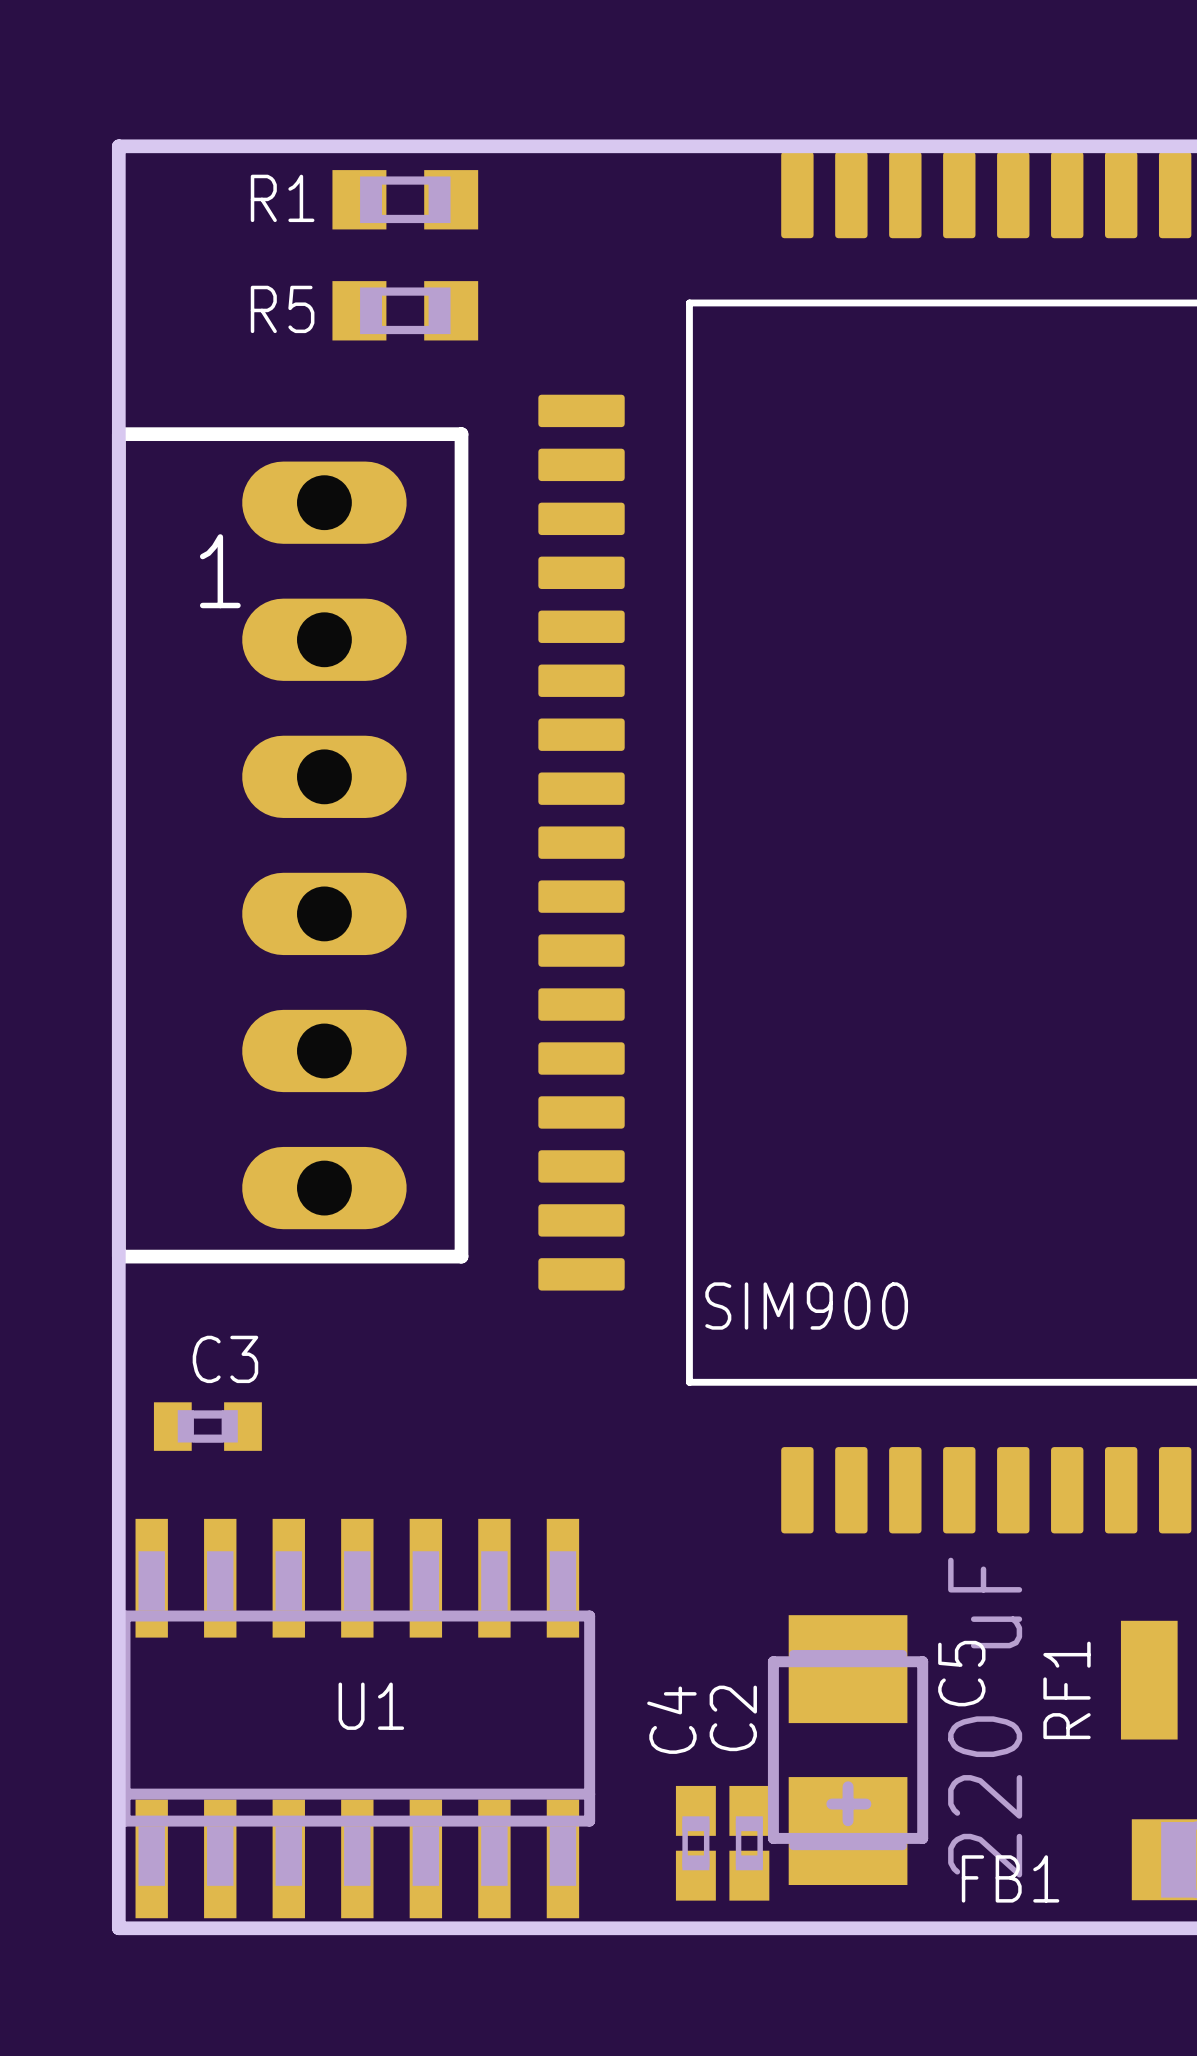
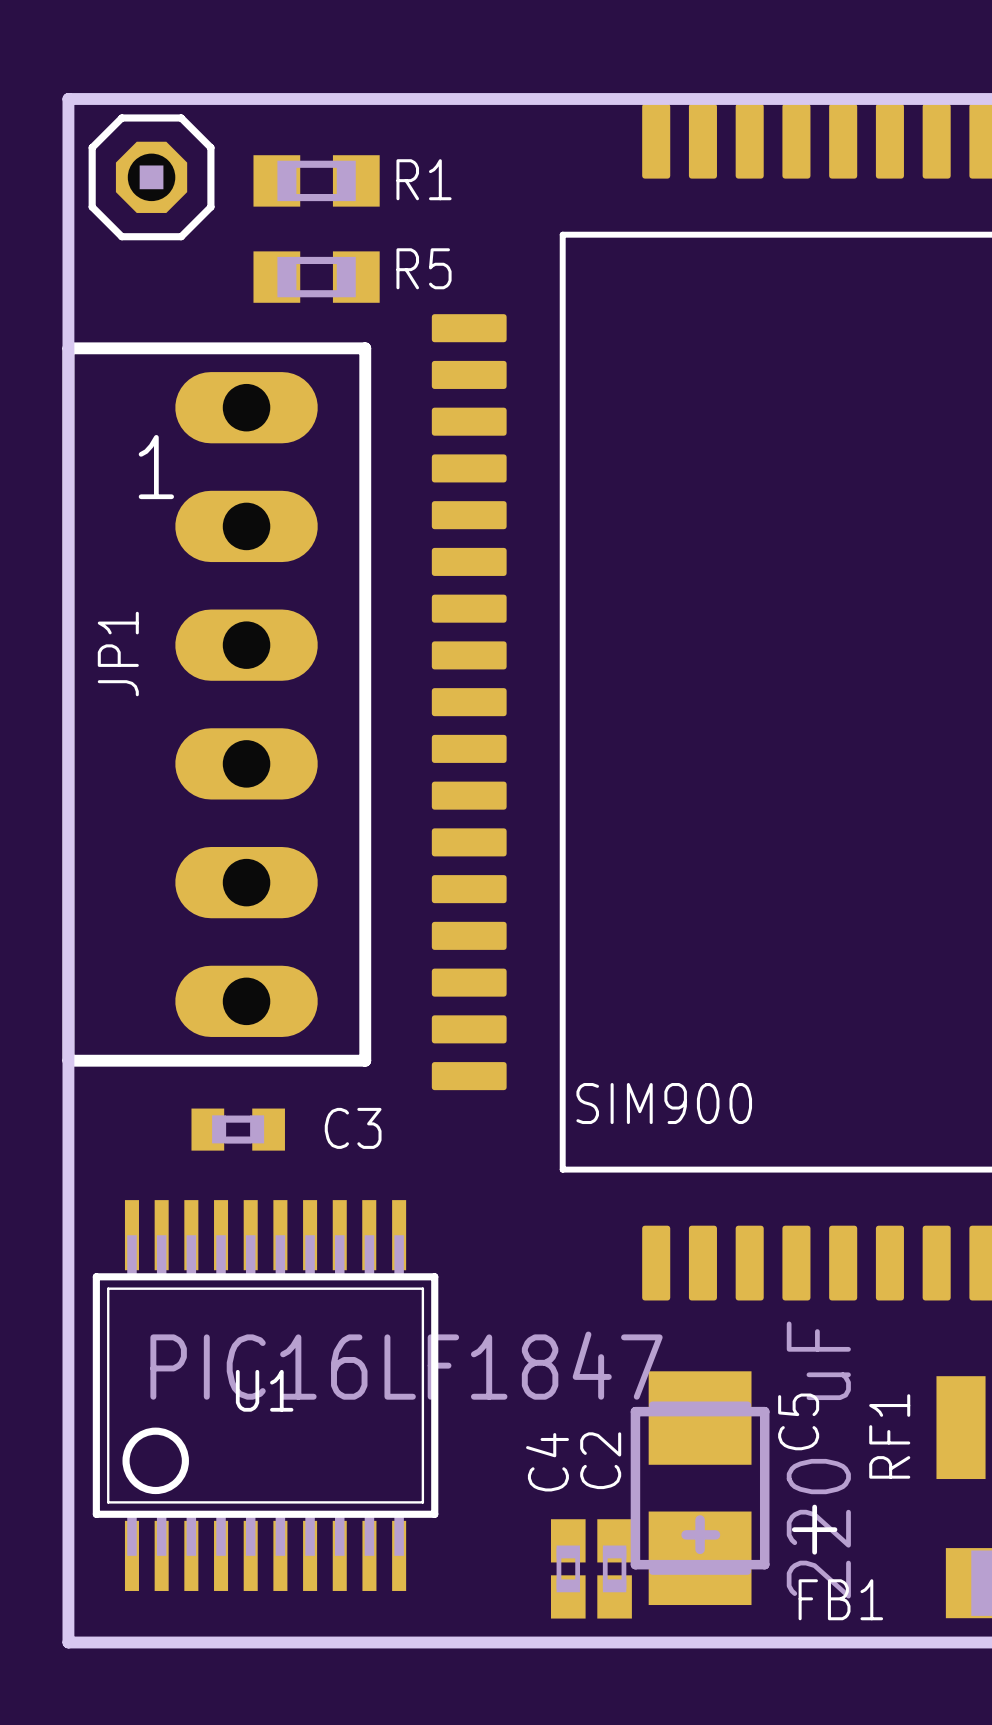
R1 name position: R1 (282, 198) -> R1 (424, 179)
R1 position: (405, 199) -> (316, 180)
part: none -> (151, 177)
R5 name position: R5 (282, 309) -> R5 (424, 268)
R5 position: (405, 310) -> (316, 277)
JP1 name: none -> JP1 (118, 654)
C3 name position: C3 (225, 1359) -> C3 (353, 1128)
C3 position: (207, 1426) -> (238, 1129)
U1 footprint: [119, 1518, 596, 1919] -> [92, 1200, 439, 1591]
U1 value: none -> PIC16LF1847 (406, 1365)
text: none -> + (814, 1529)

